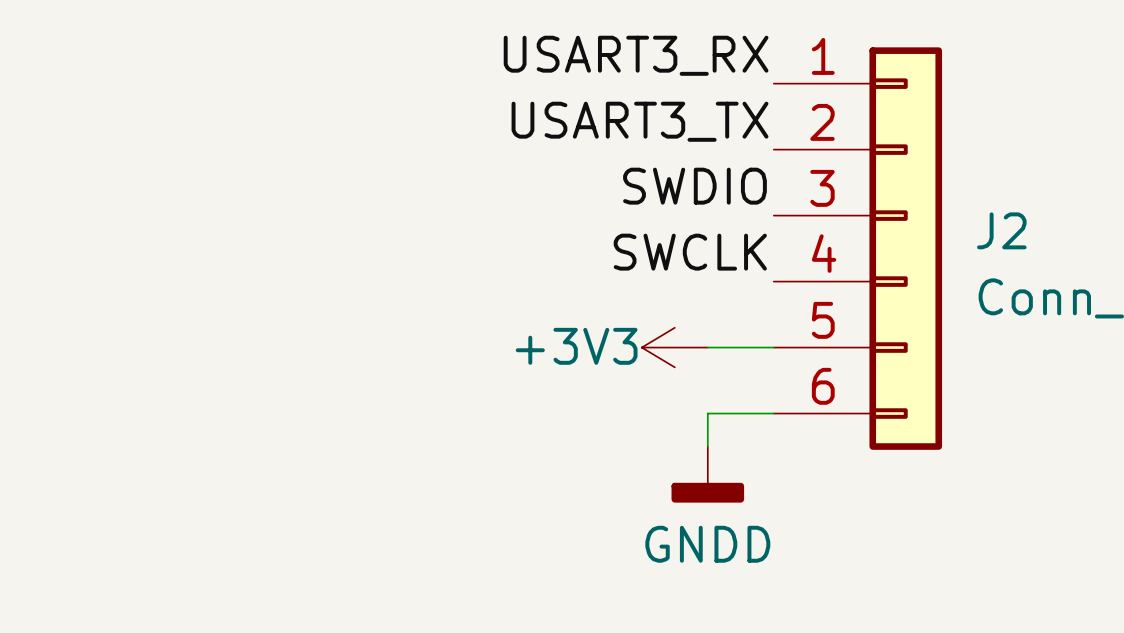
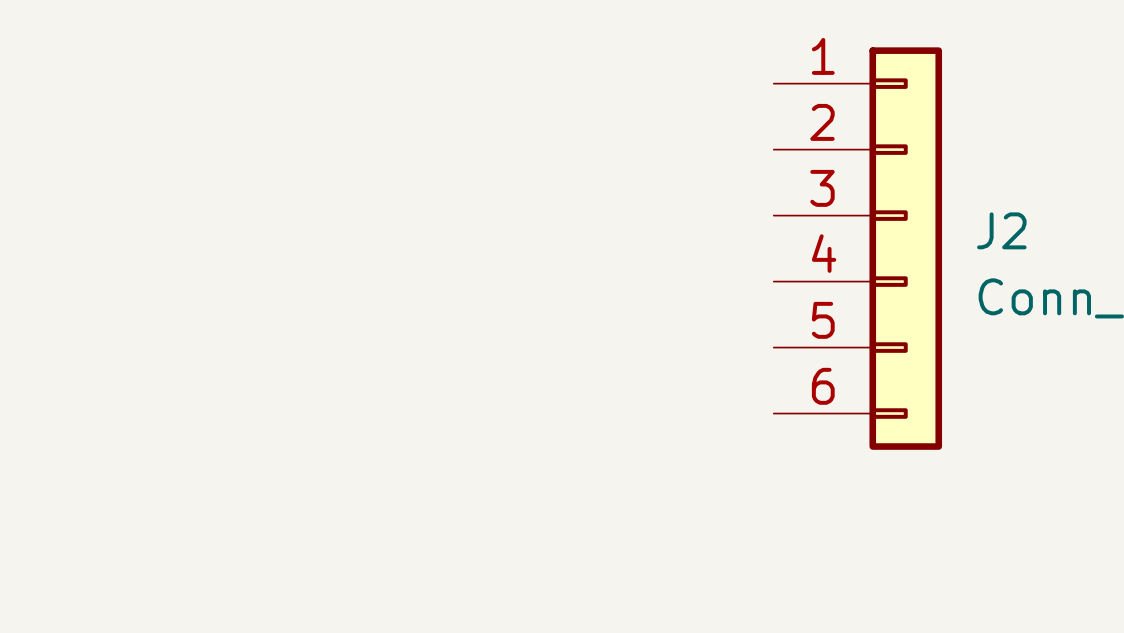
label: USART3_RX (636, 55) -> none
label: USART3_TX (640, 121) -> none
label: SWDIO (694, 186) -> none
label: SWCLK (690, 252) -> none
power symbol: +3V3 (674, 347) -> none
wire: (707, 347) (773, 347) -> none
wire: (773, 413) (707, 413) (707, 446) -> none
power symbol: GNDD (707, 474) -> none

